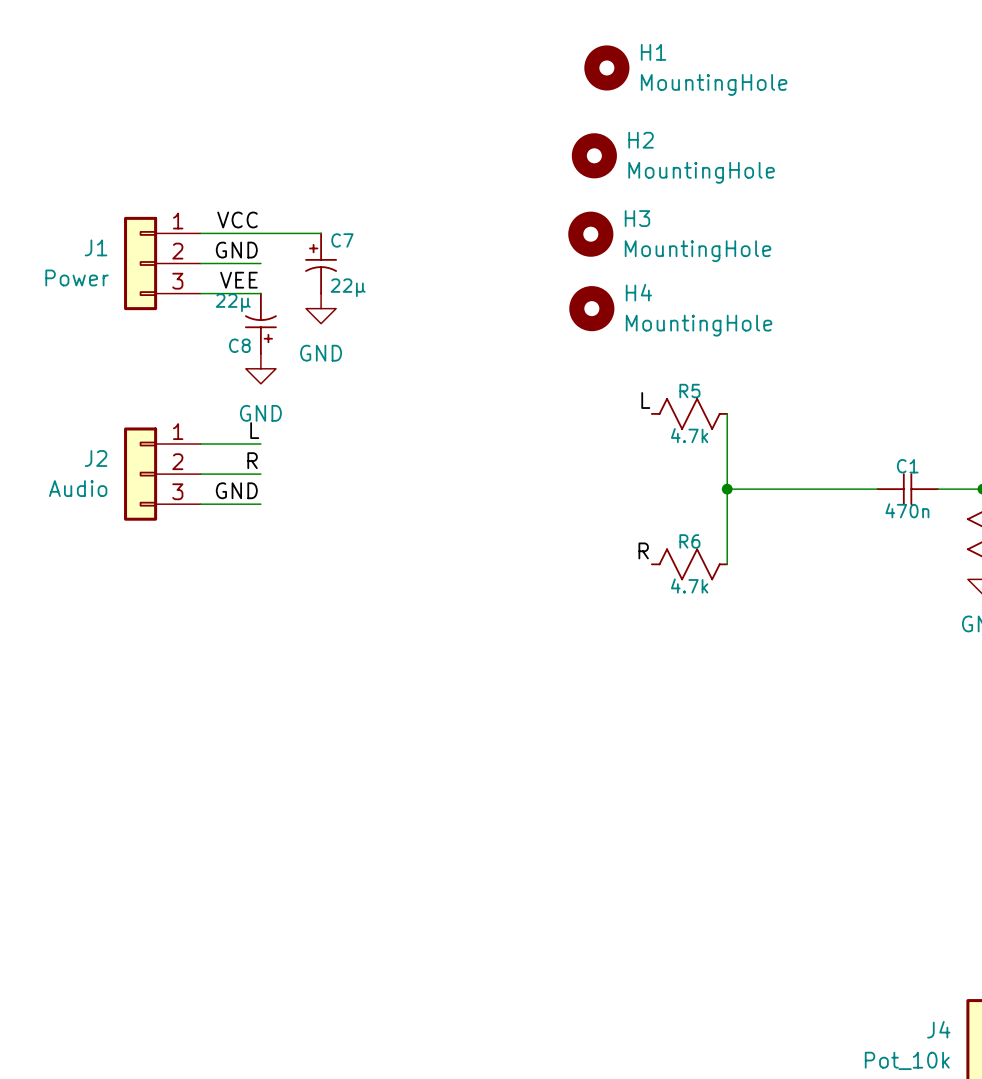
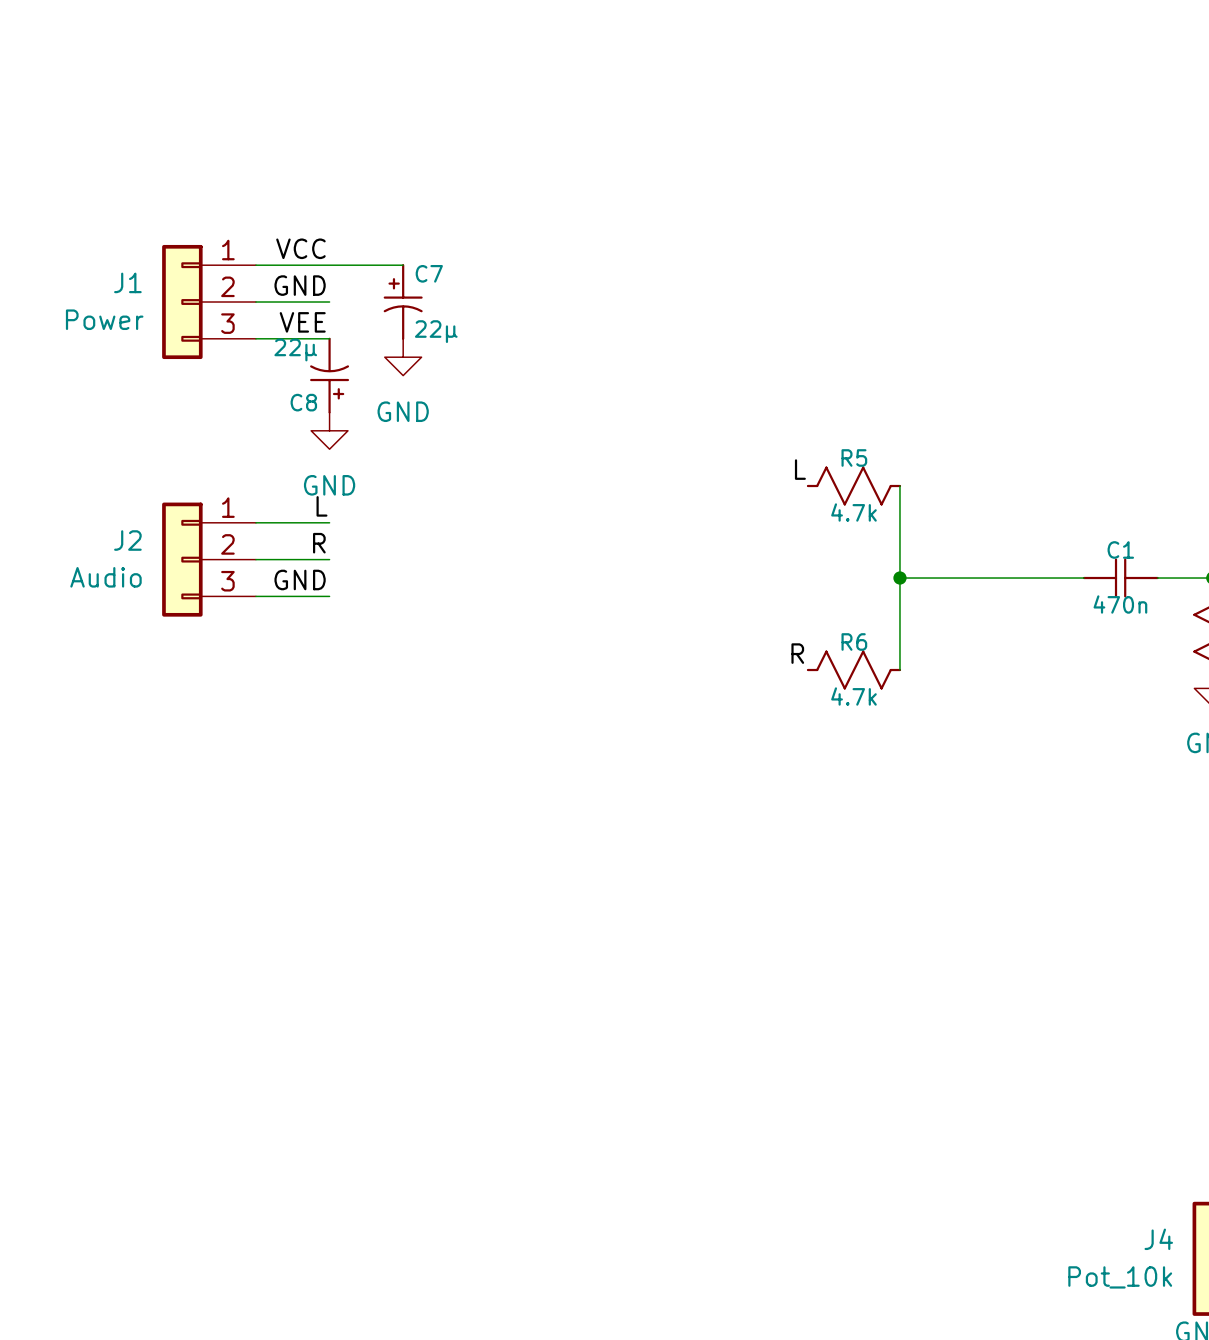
H1: MountingHole (606, 67) -> none
H2: MountingHole (594, 155) -> none
H3: MountingHole (590, 234) -> none
H4: MountingHole (591, 308) -> none

